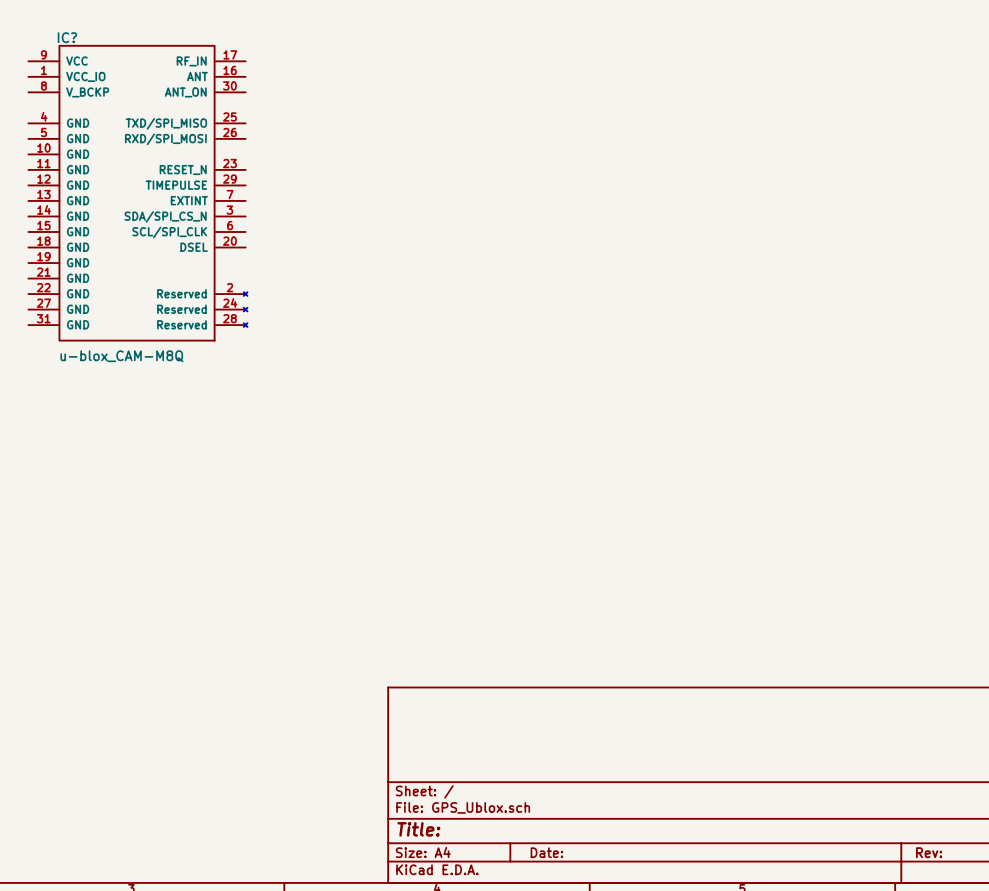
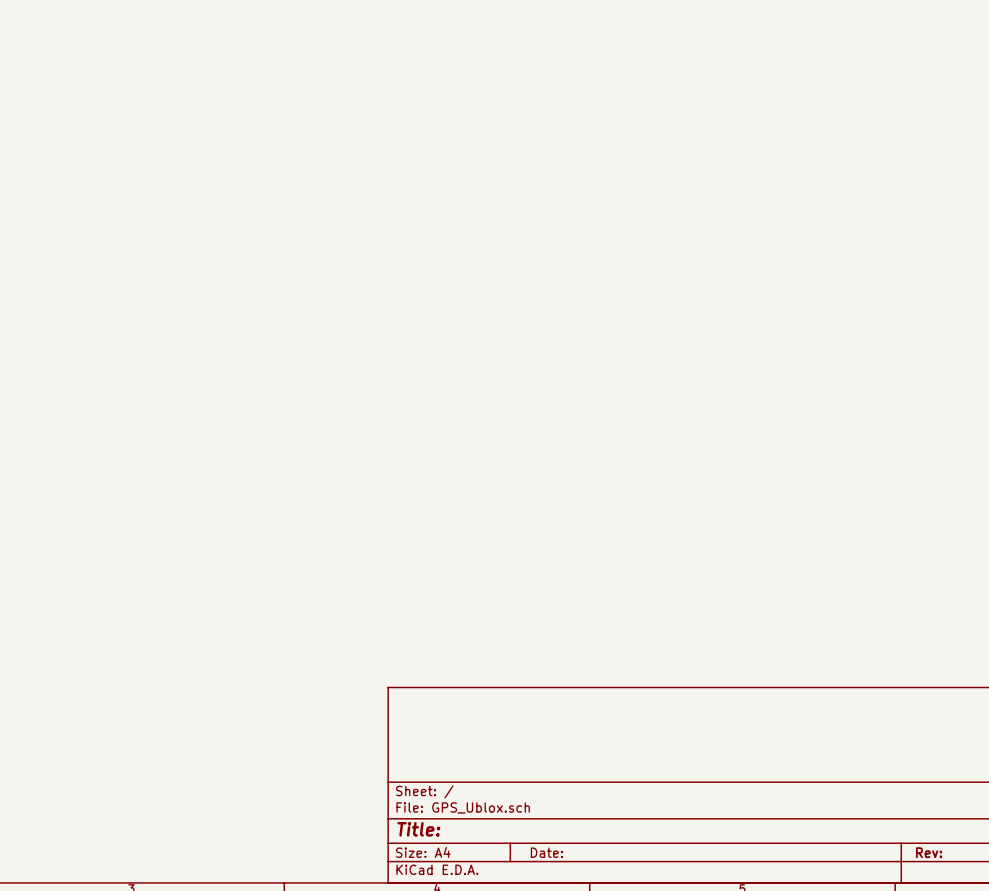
IC?: u-blox_CAM-M8Q (137, 193) -> none

